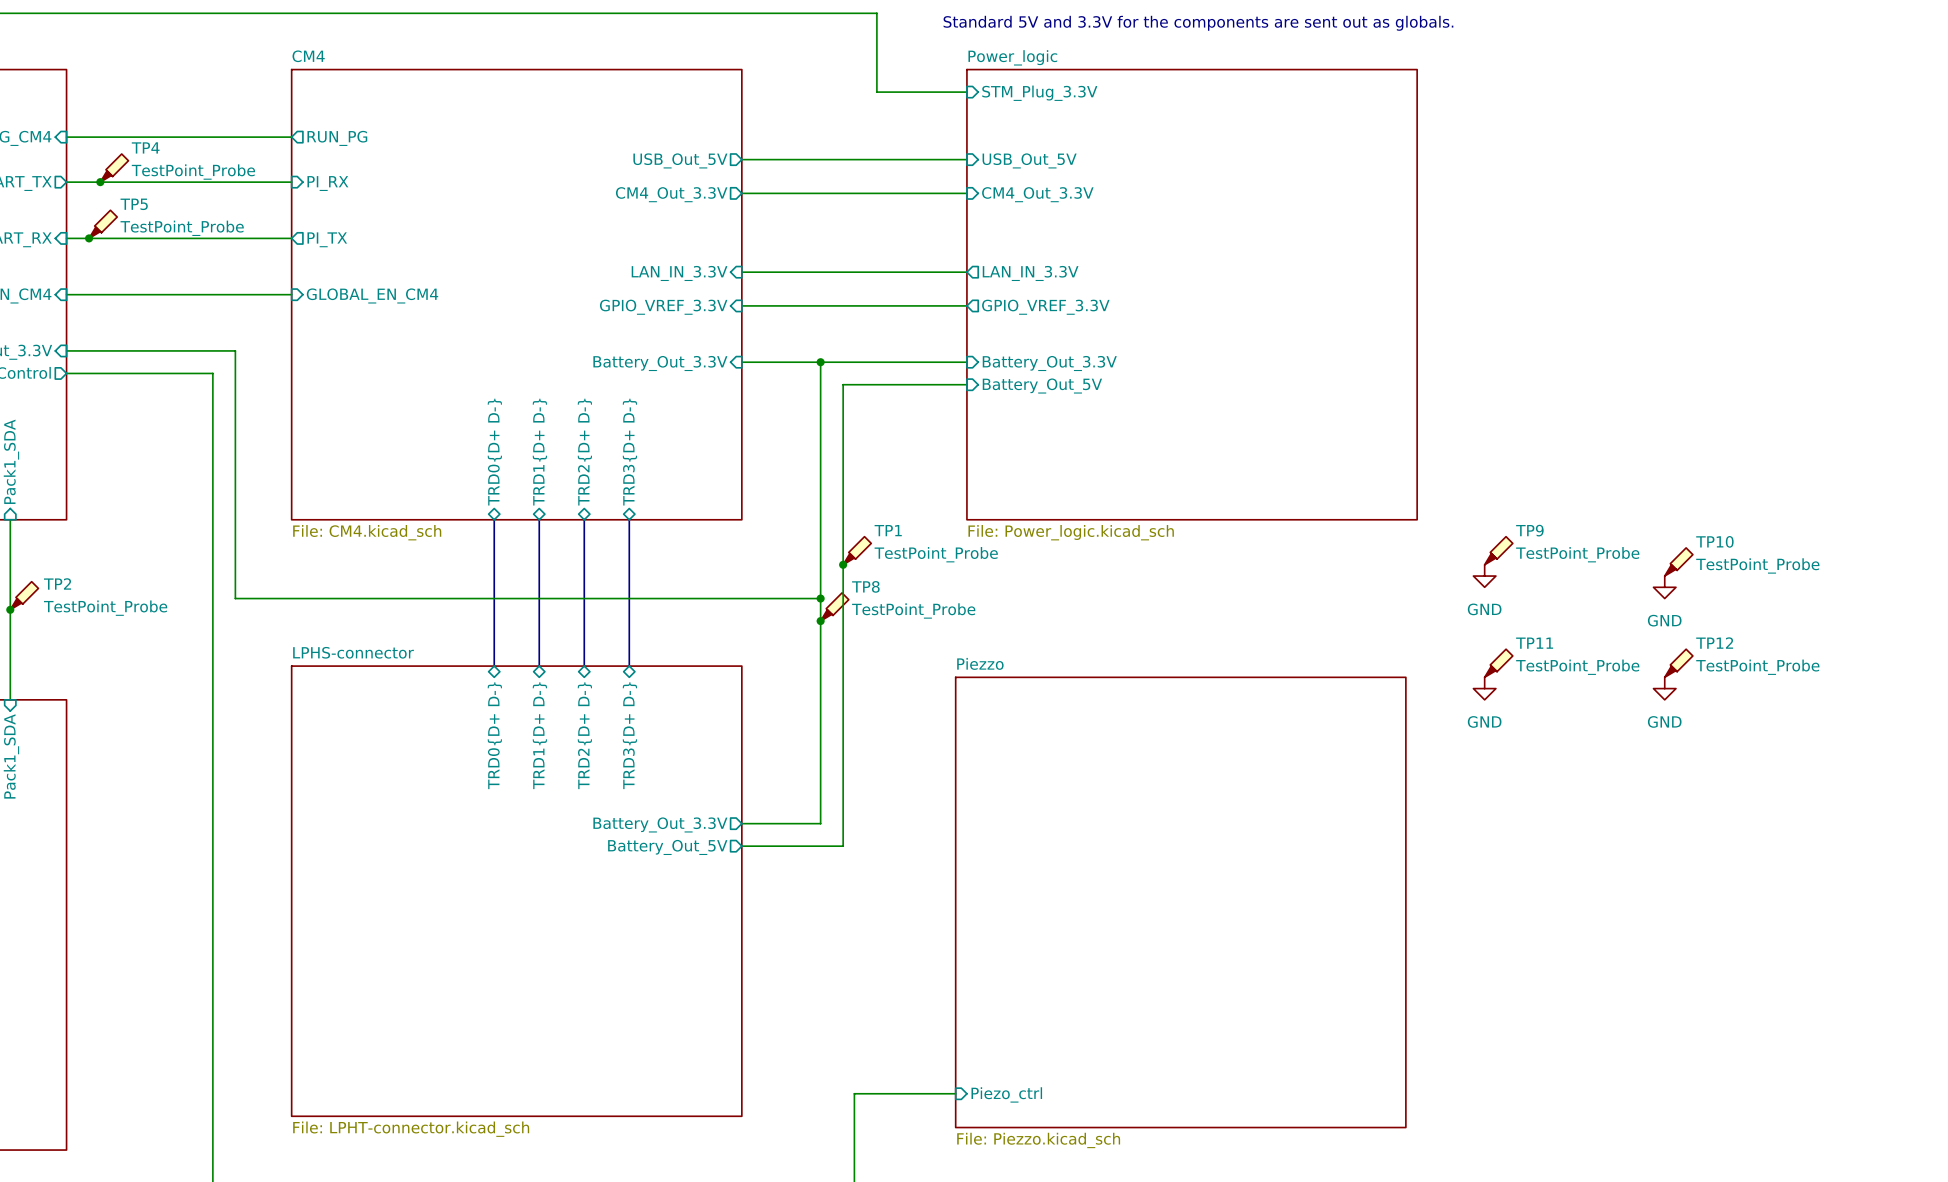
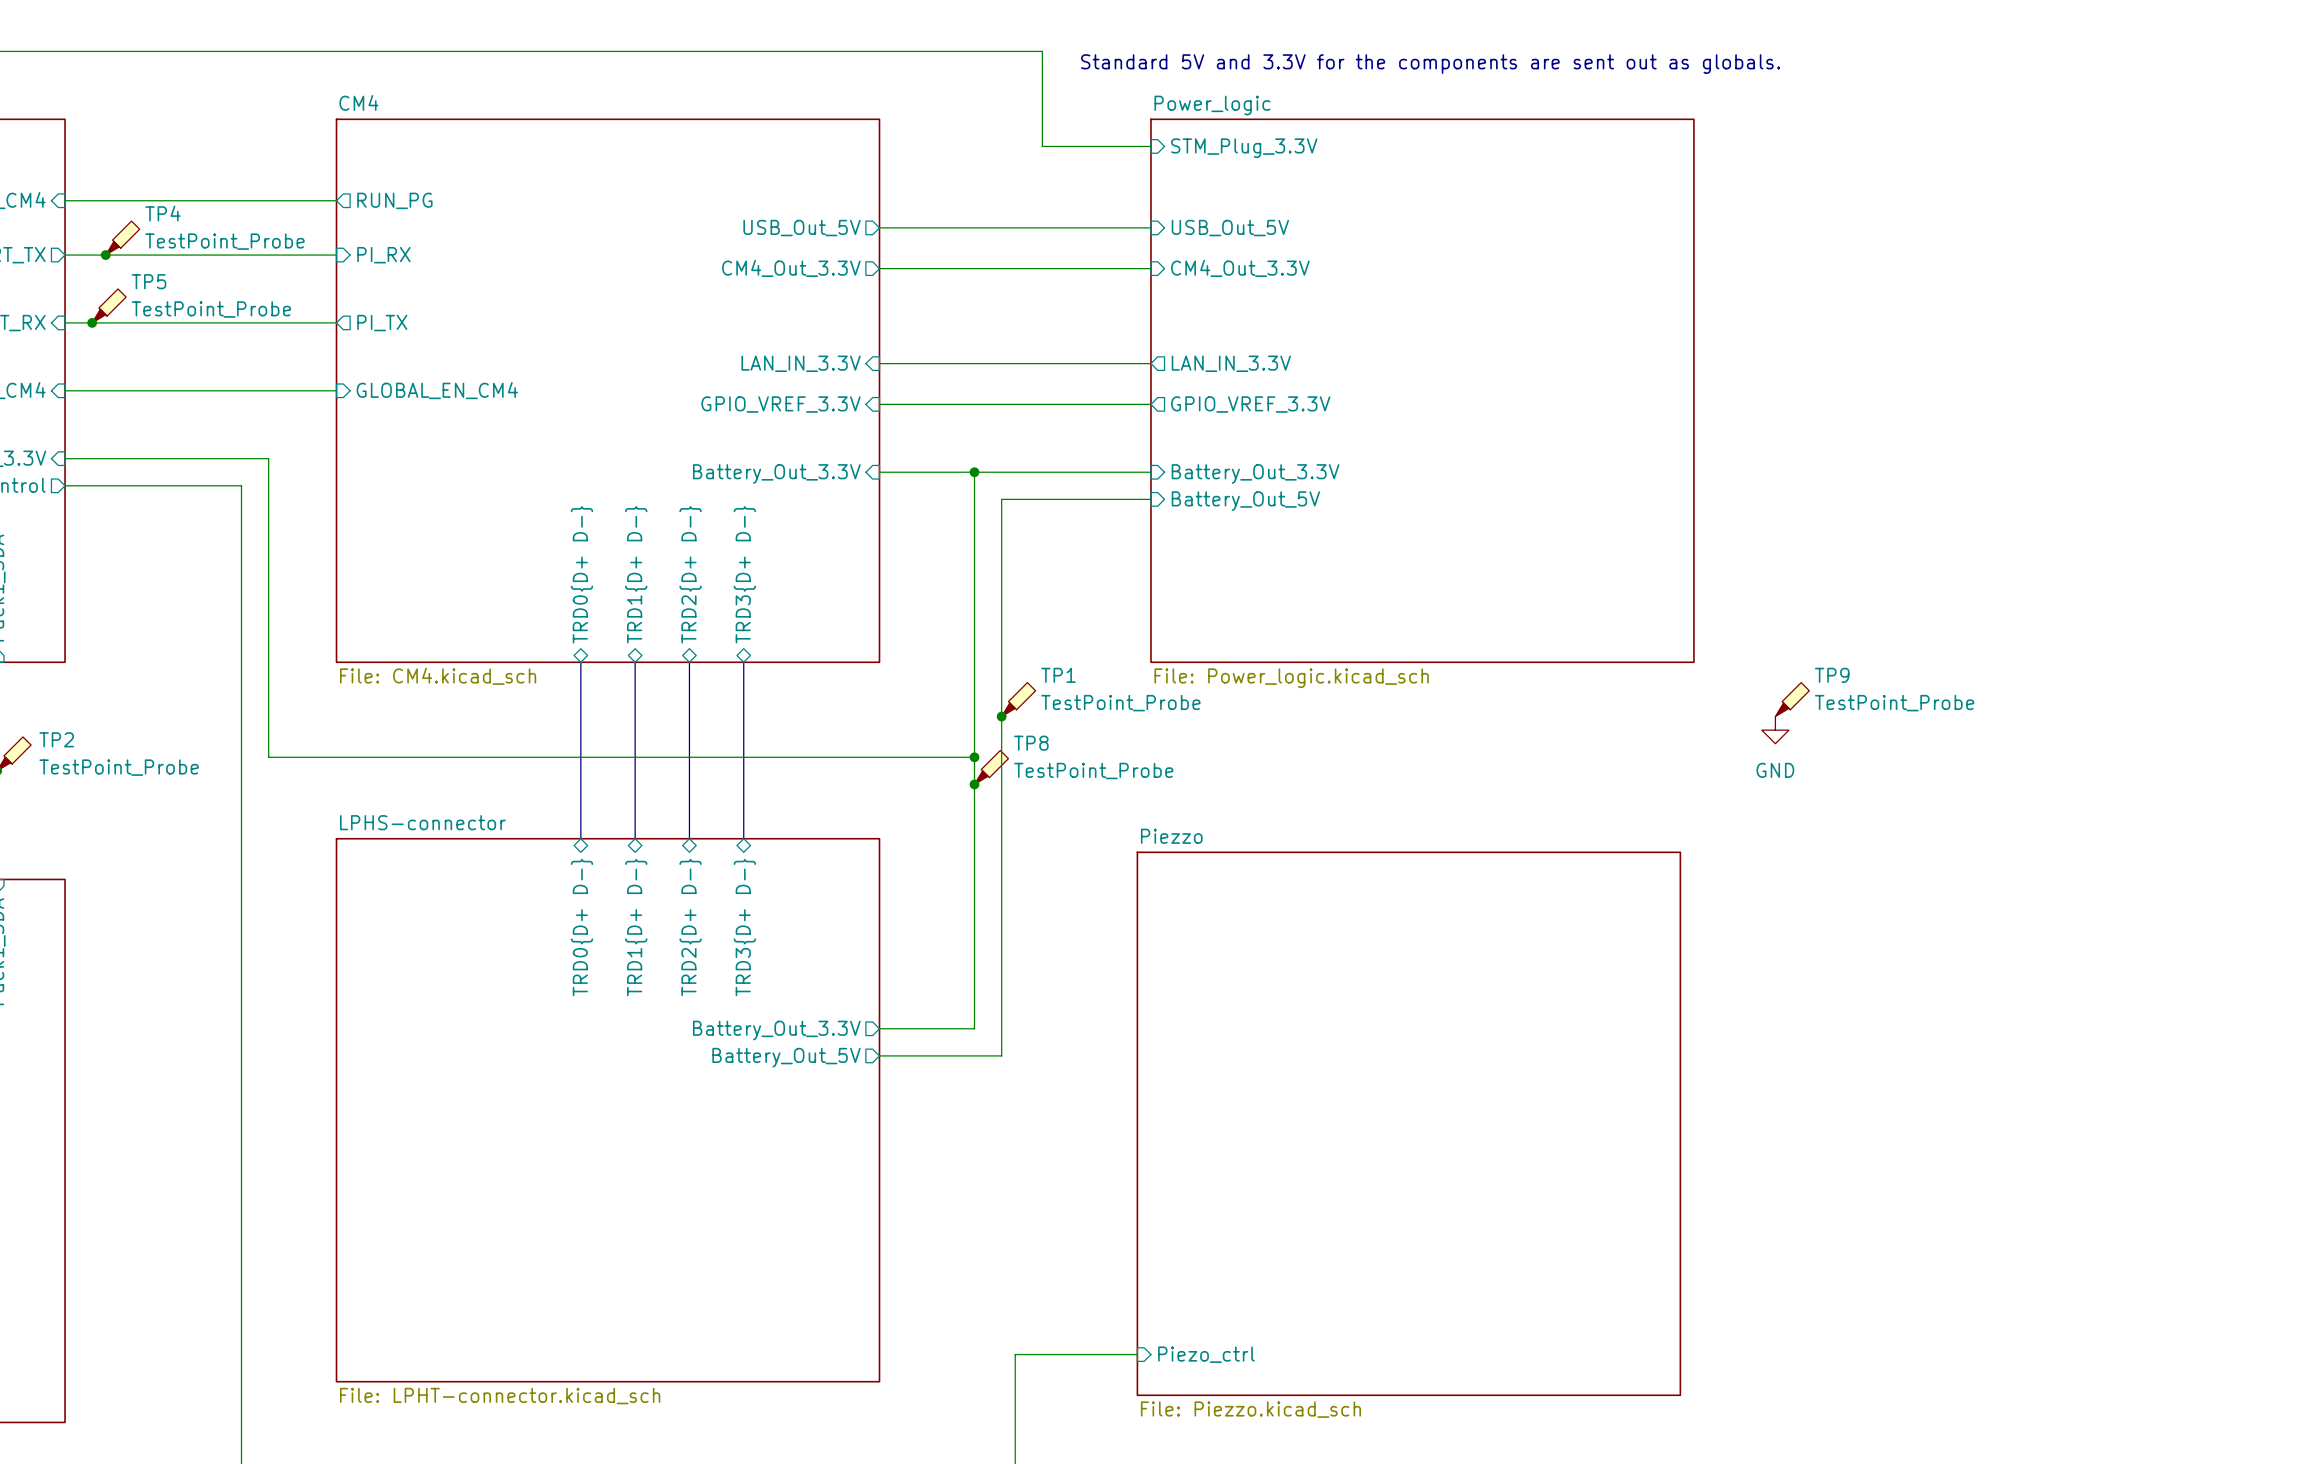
TP10: TestPoint_Probe (1678, 561) -> none
power symbol: GND (1664, 587) -> none
TP11: TestPoint_Probe (1498, 663) -> none
TP12: TestPoint_Probe (1678, 663) -> none
power symbol: GND (1484, 688) -> none
power symbol: GND (1664, 688) -> none

